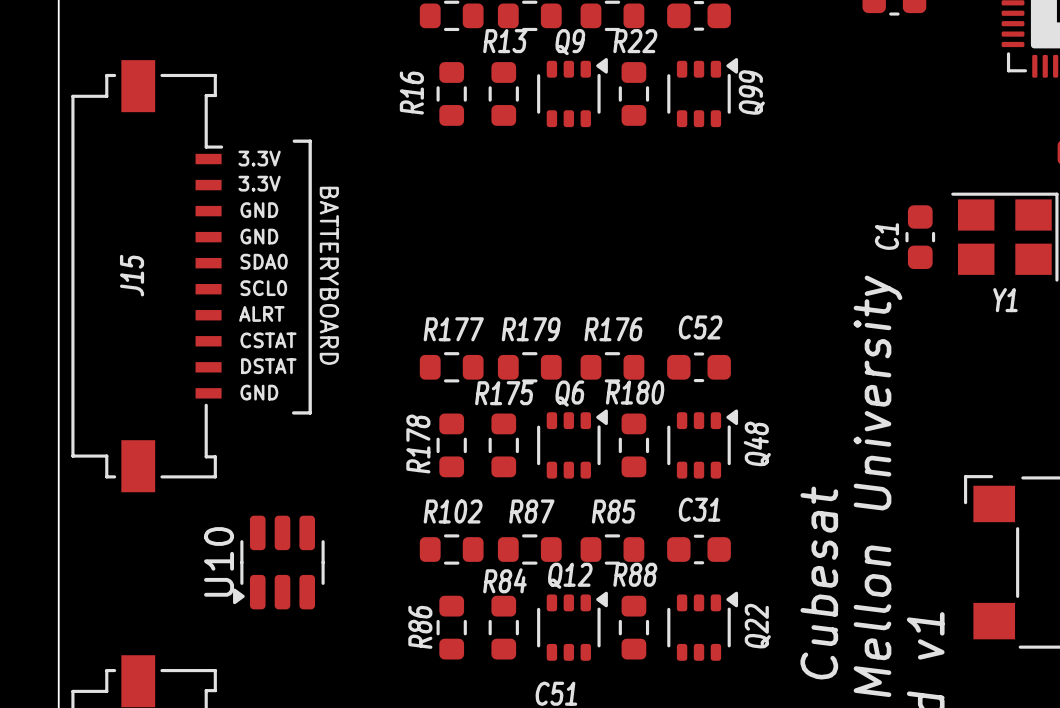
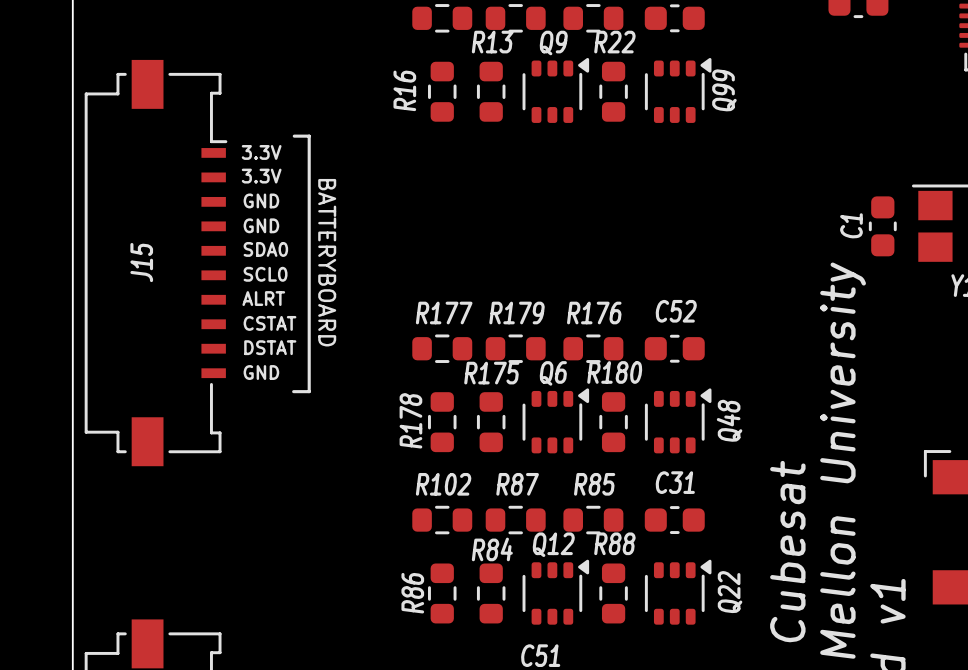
U10: (278, 562) -> none

